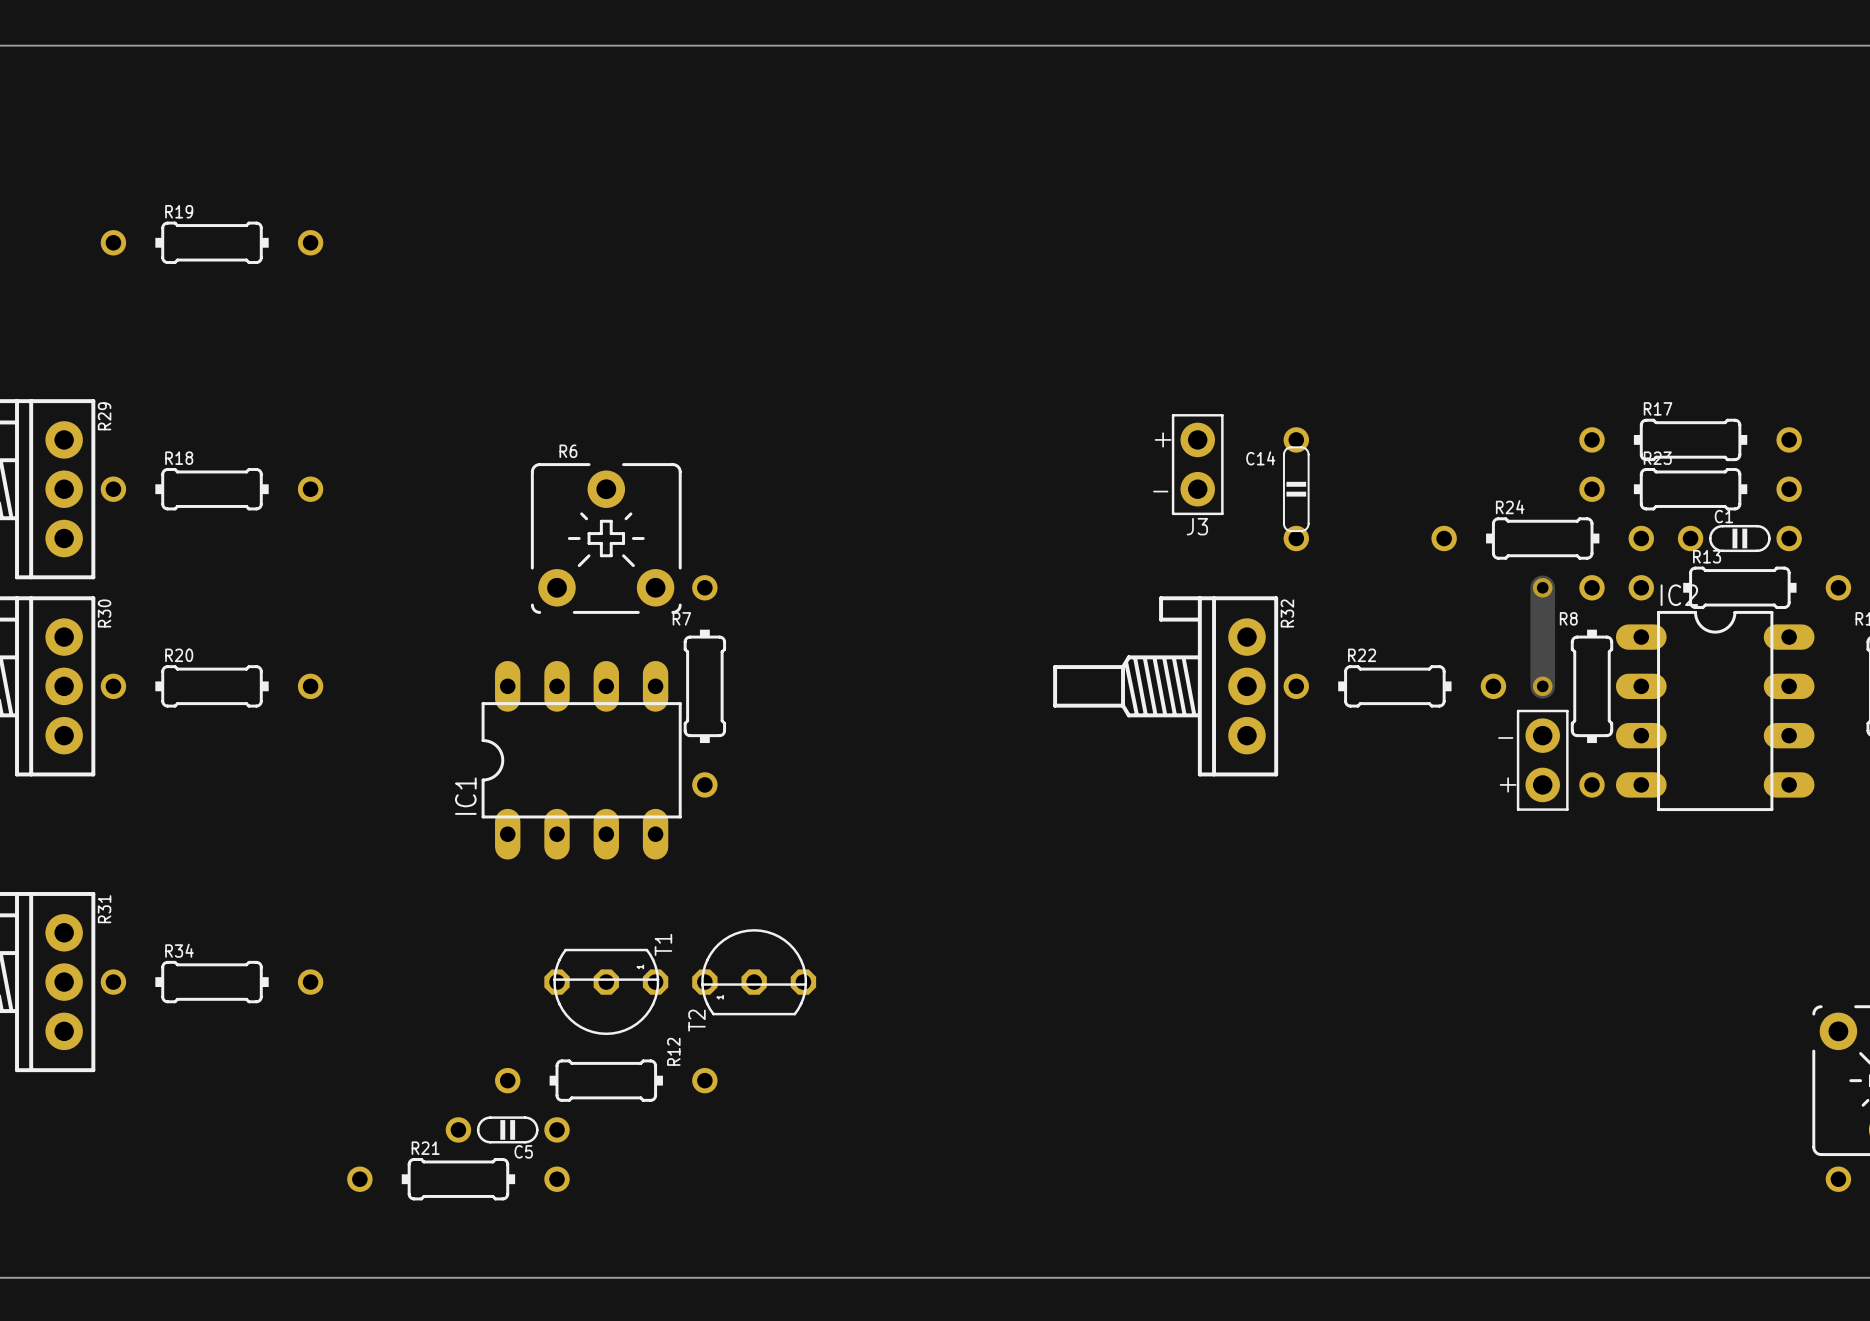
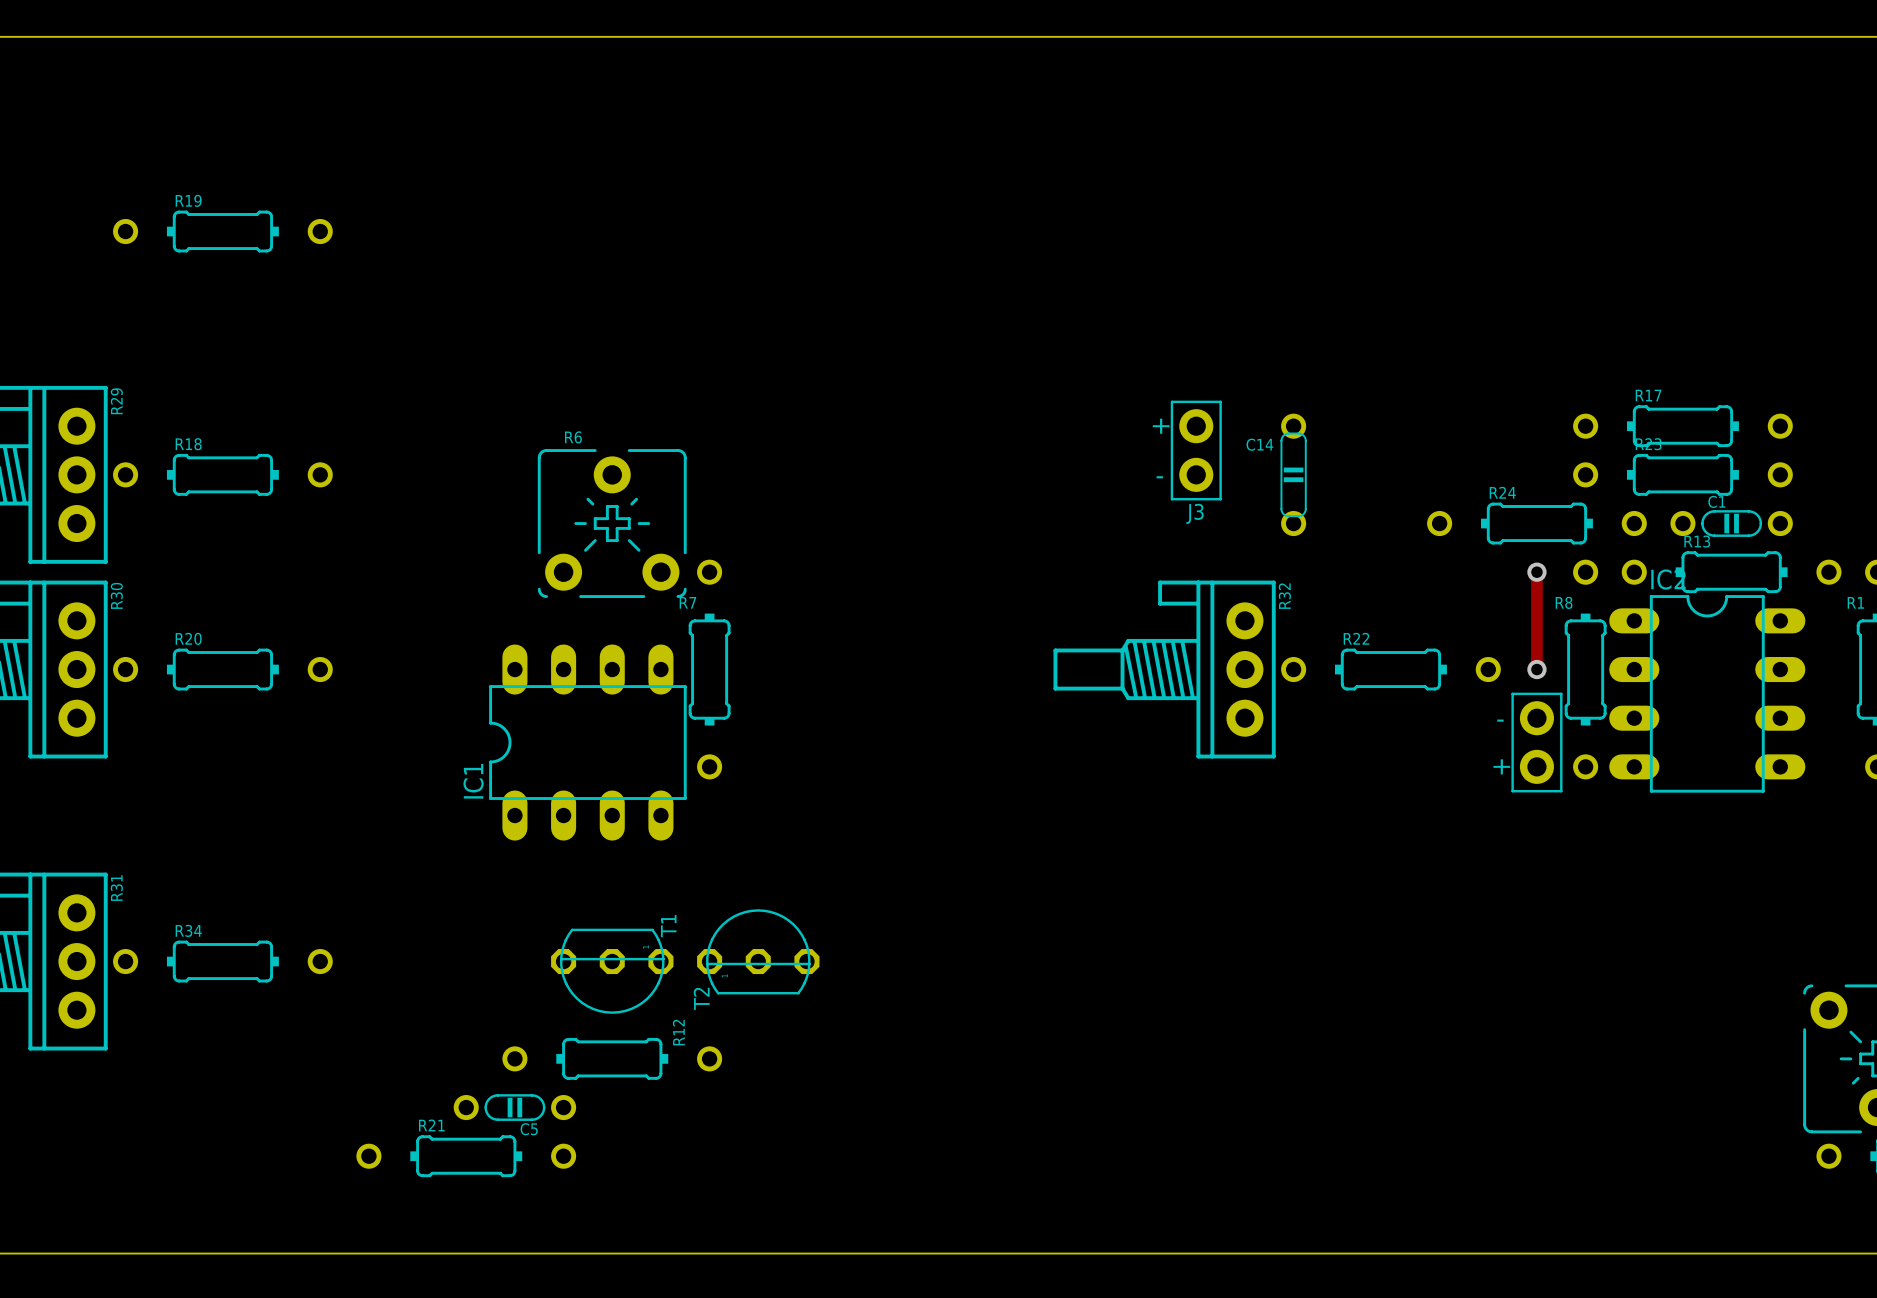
track width: thick (1542, 587) (1542, 686) -> thin (1536, 572) (1536, 669)

